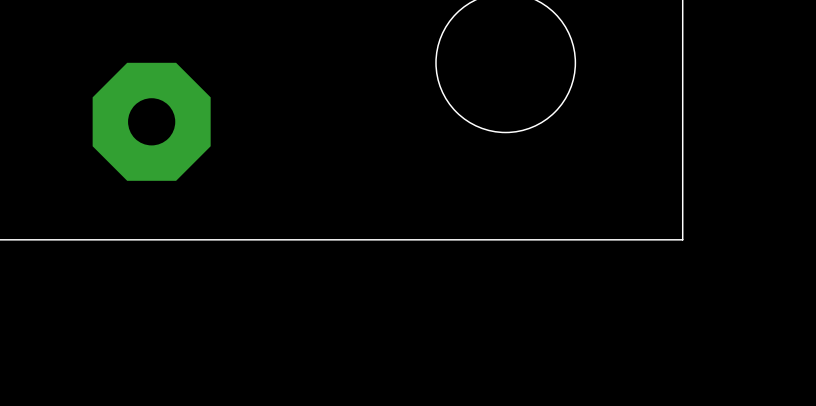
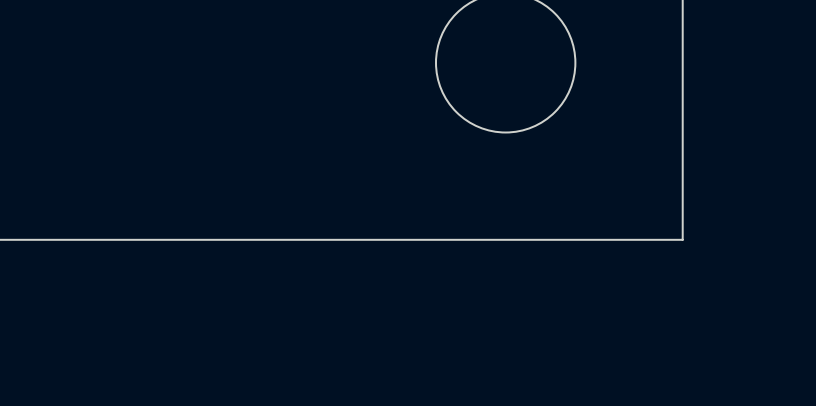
part: (151, 121) -> none

